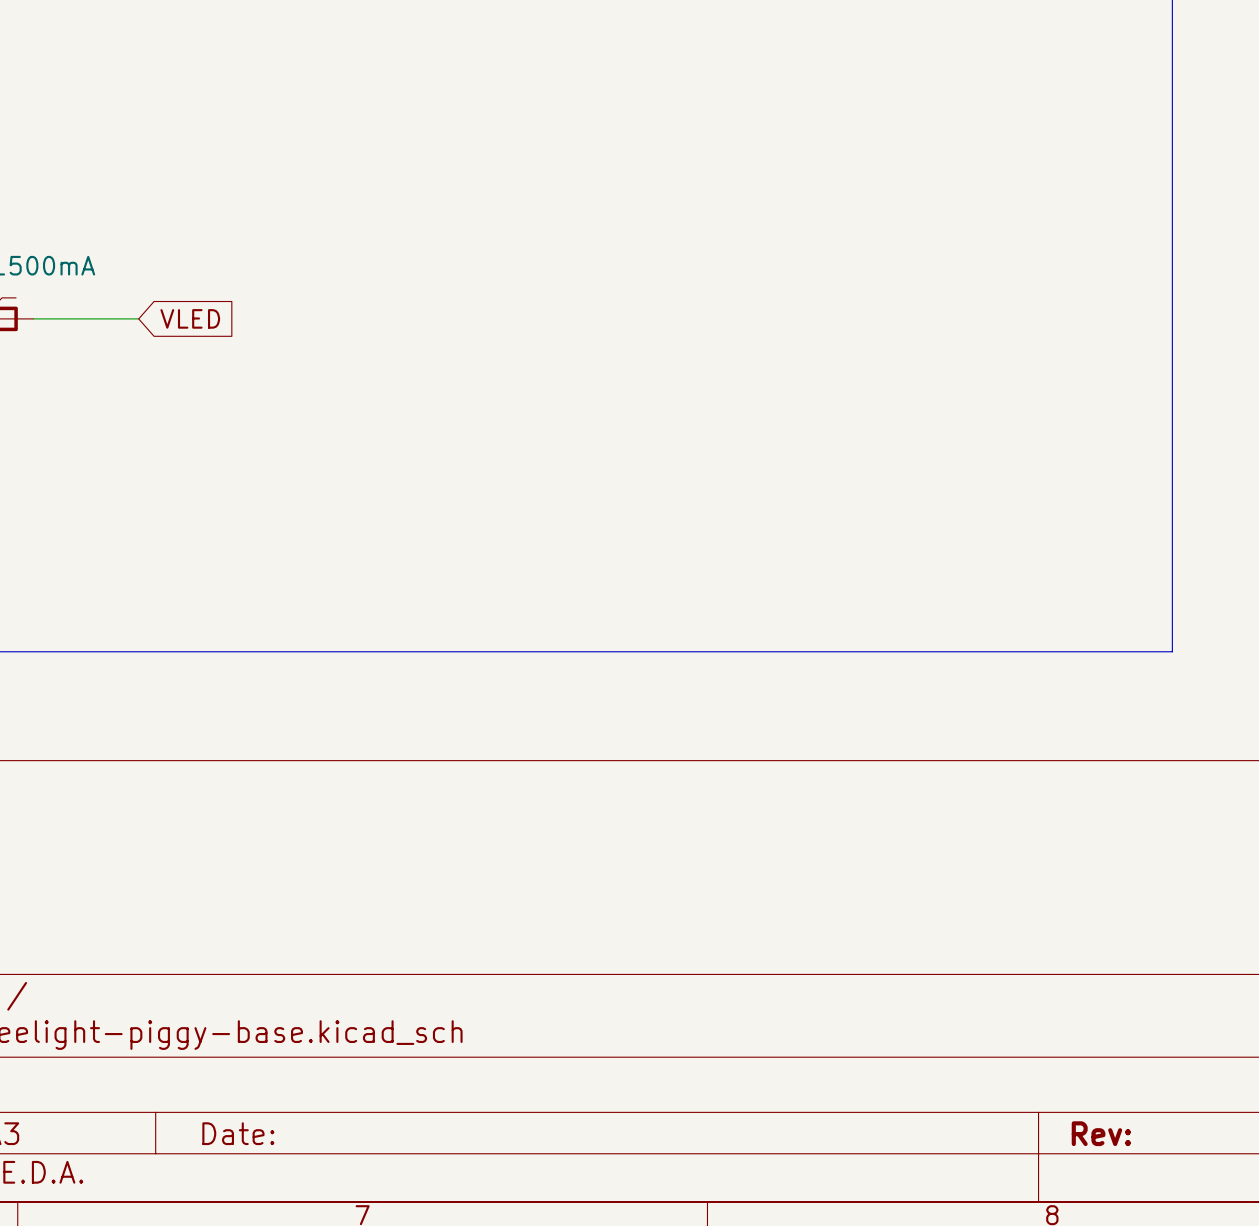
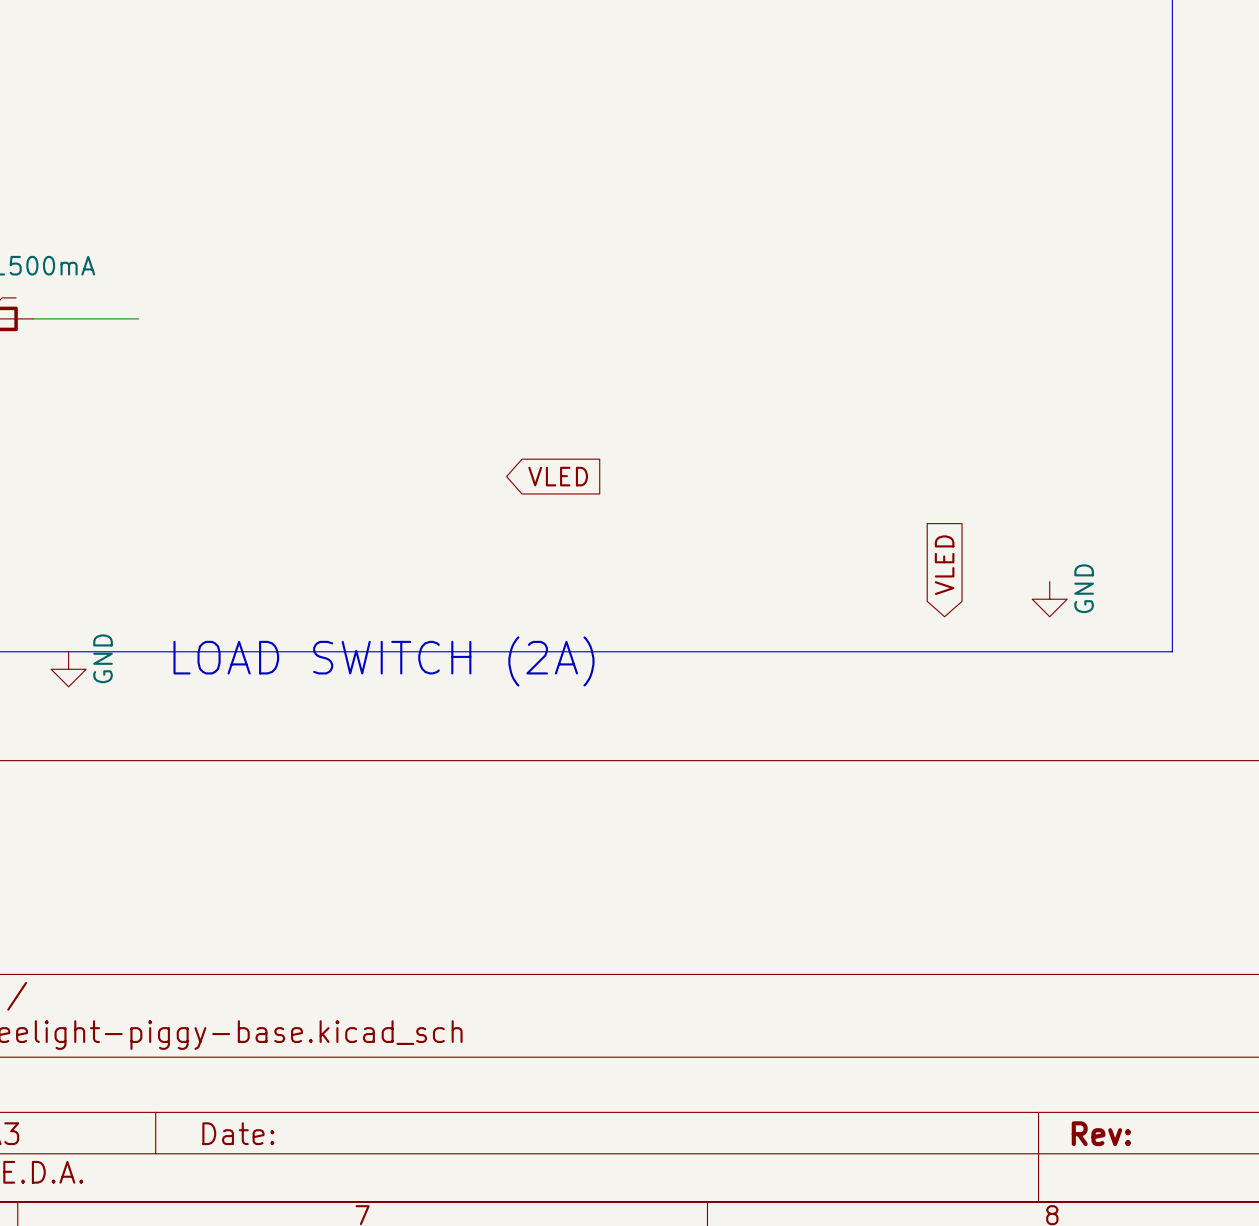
global label: VLED (190, 318) -> none
global label: none -> VLED (558, 476)
global label: none -> VLED (944, 565)
power symbol: none -> GND (1049, 599)
text: none -> LOAD SWITCH (2A) (383, 661)
power symbol: none -> GND (68, 669)

